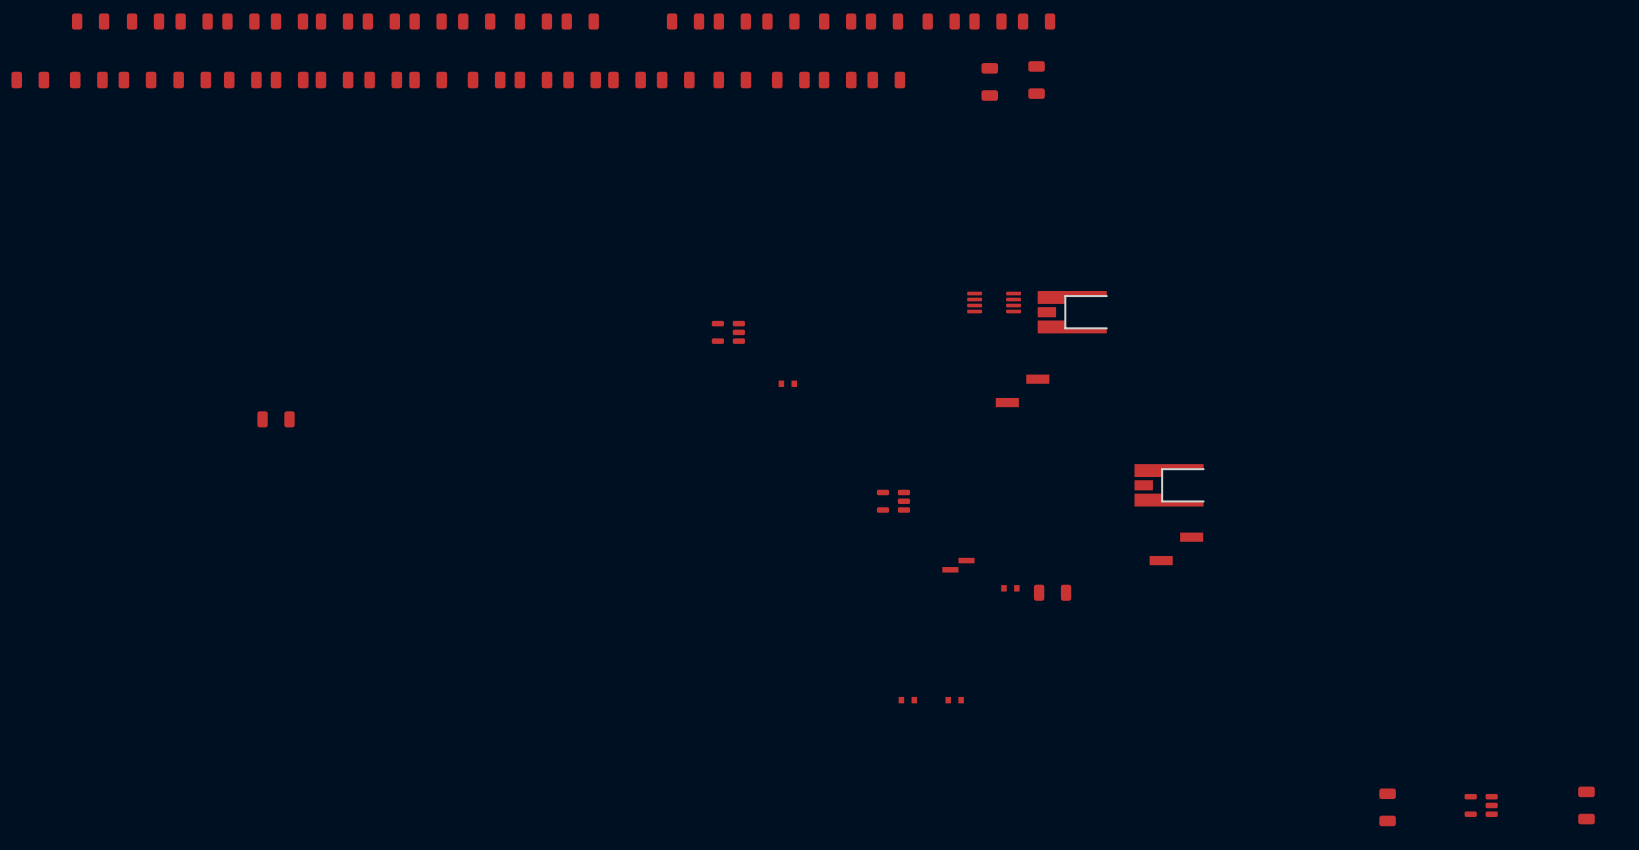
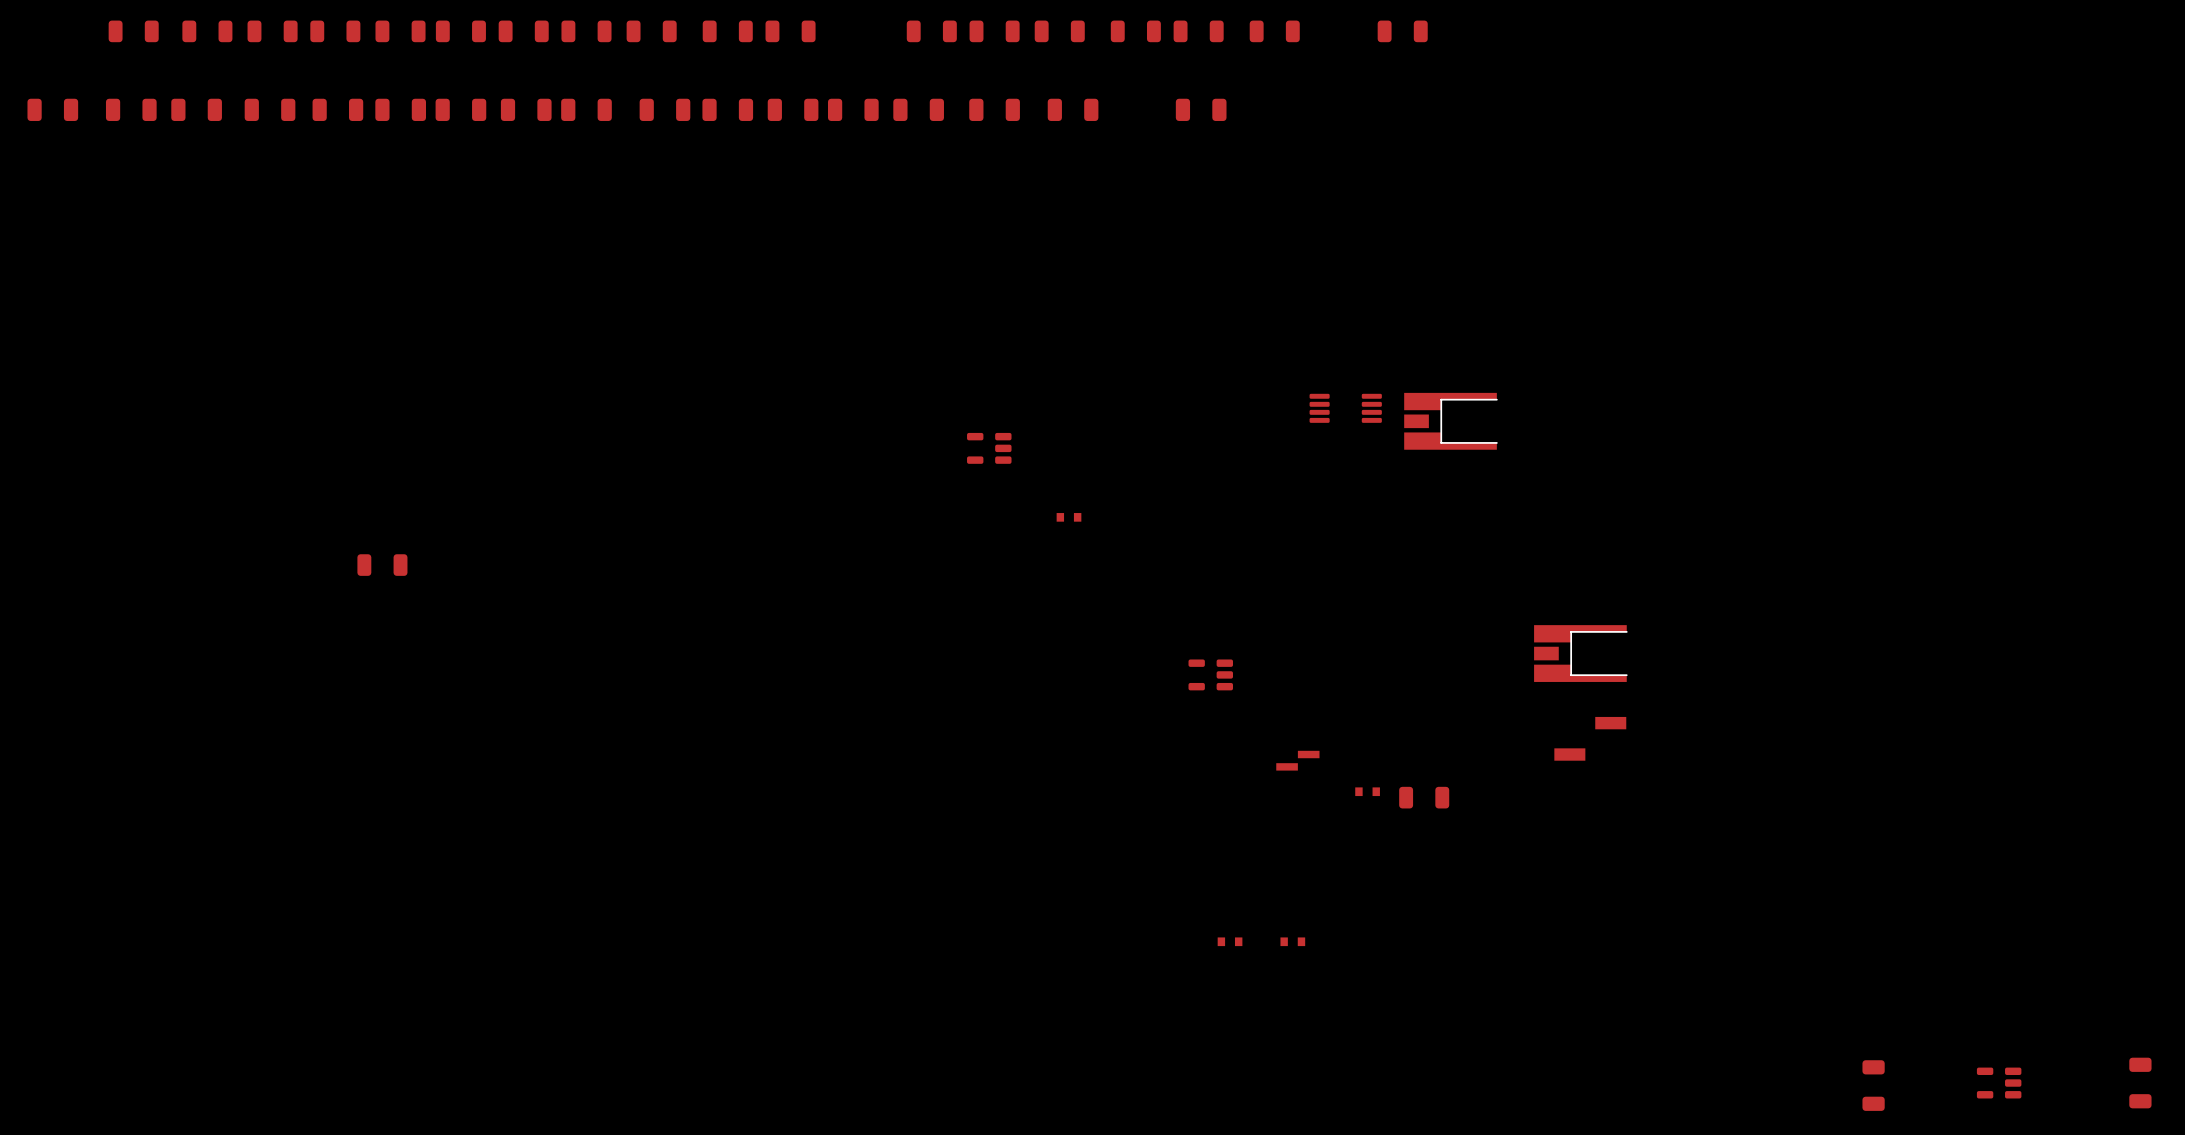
part: (987, 21) -> none
part: (837, 80) -> none
part: (1036, 80) -> none
part: (989, 81) -> none
part: (1022, 390) -> none

